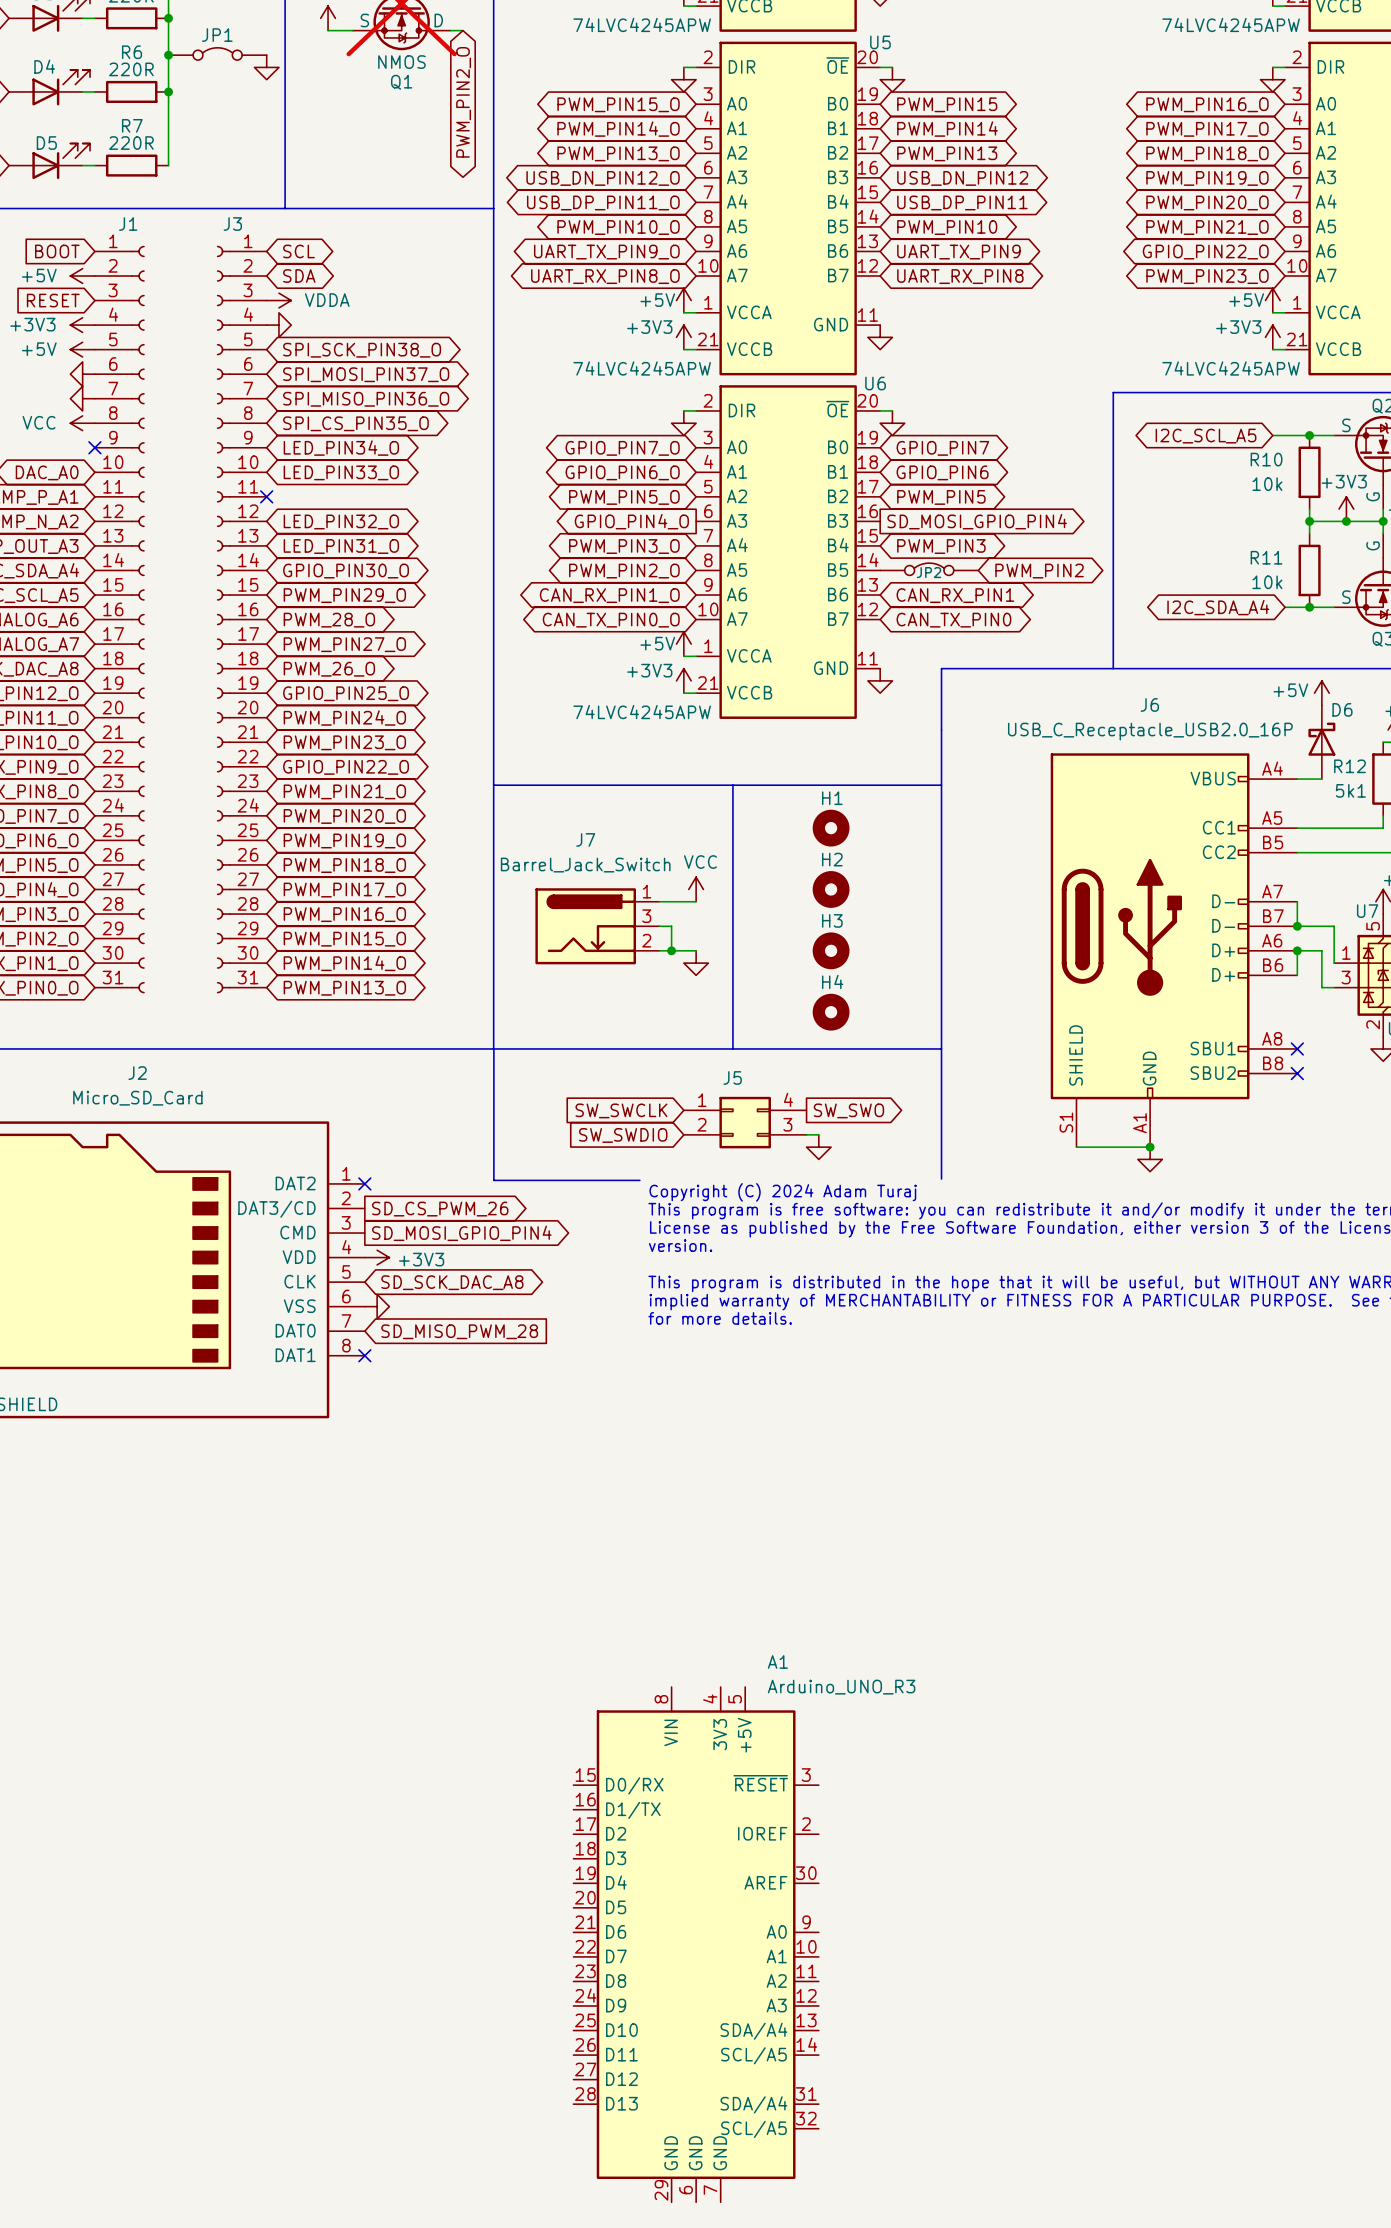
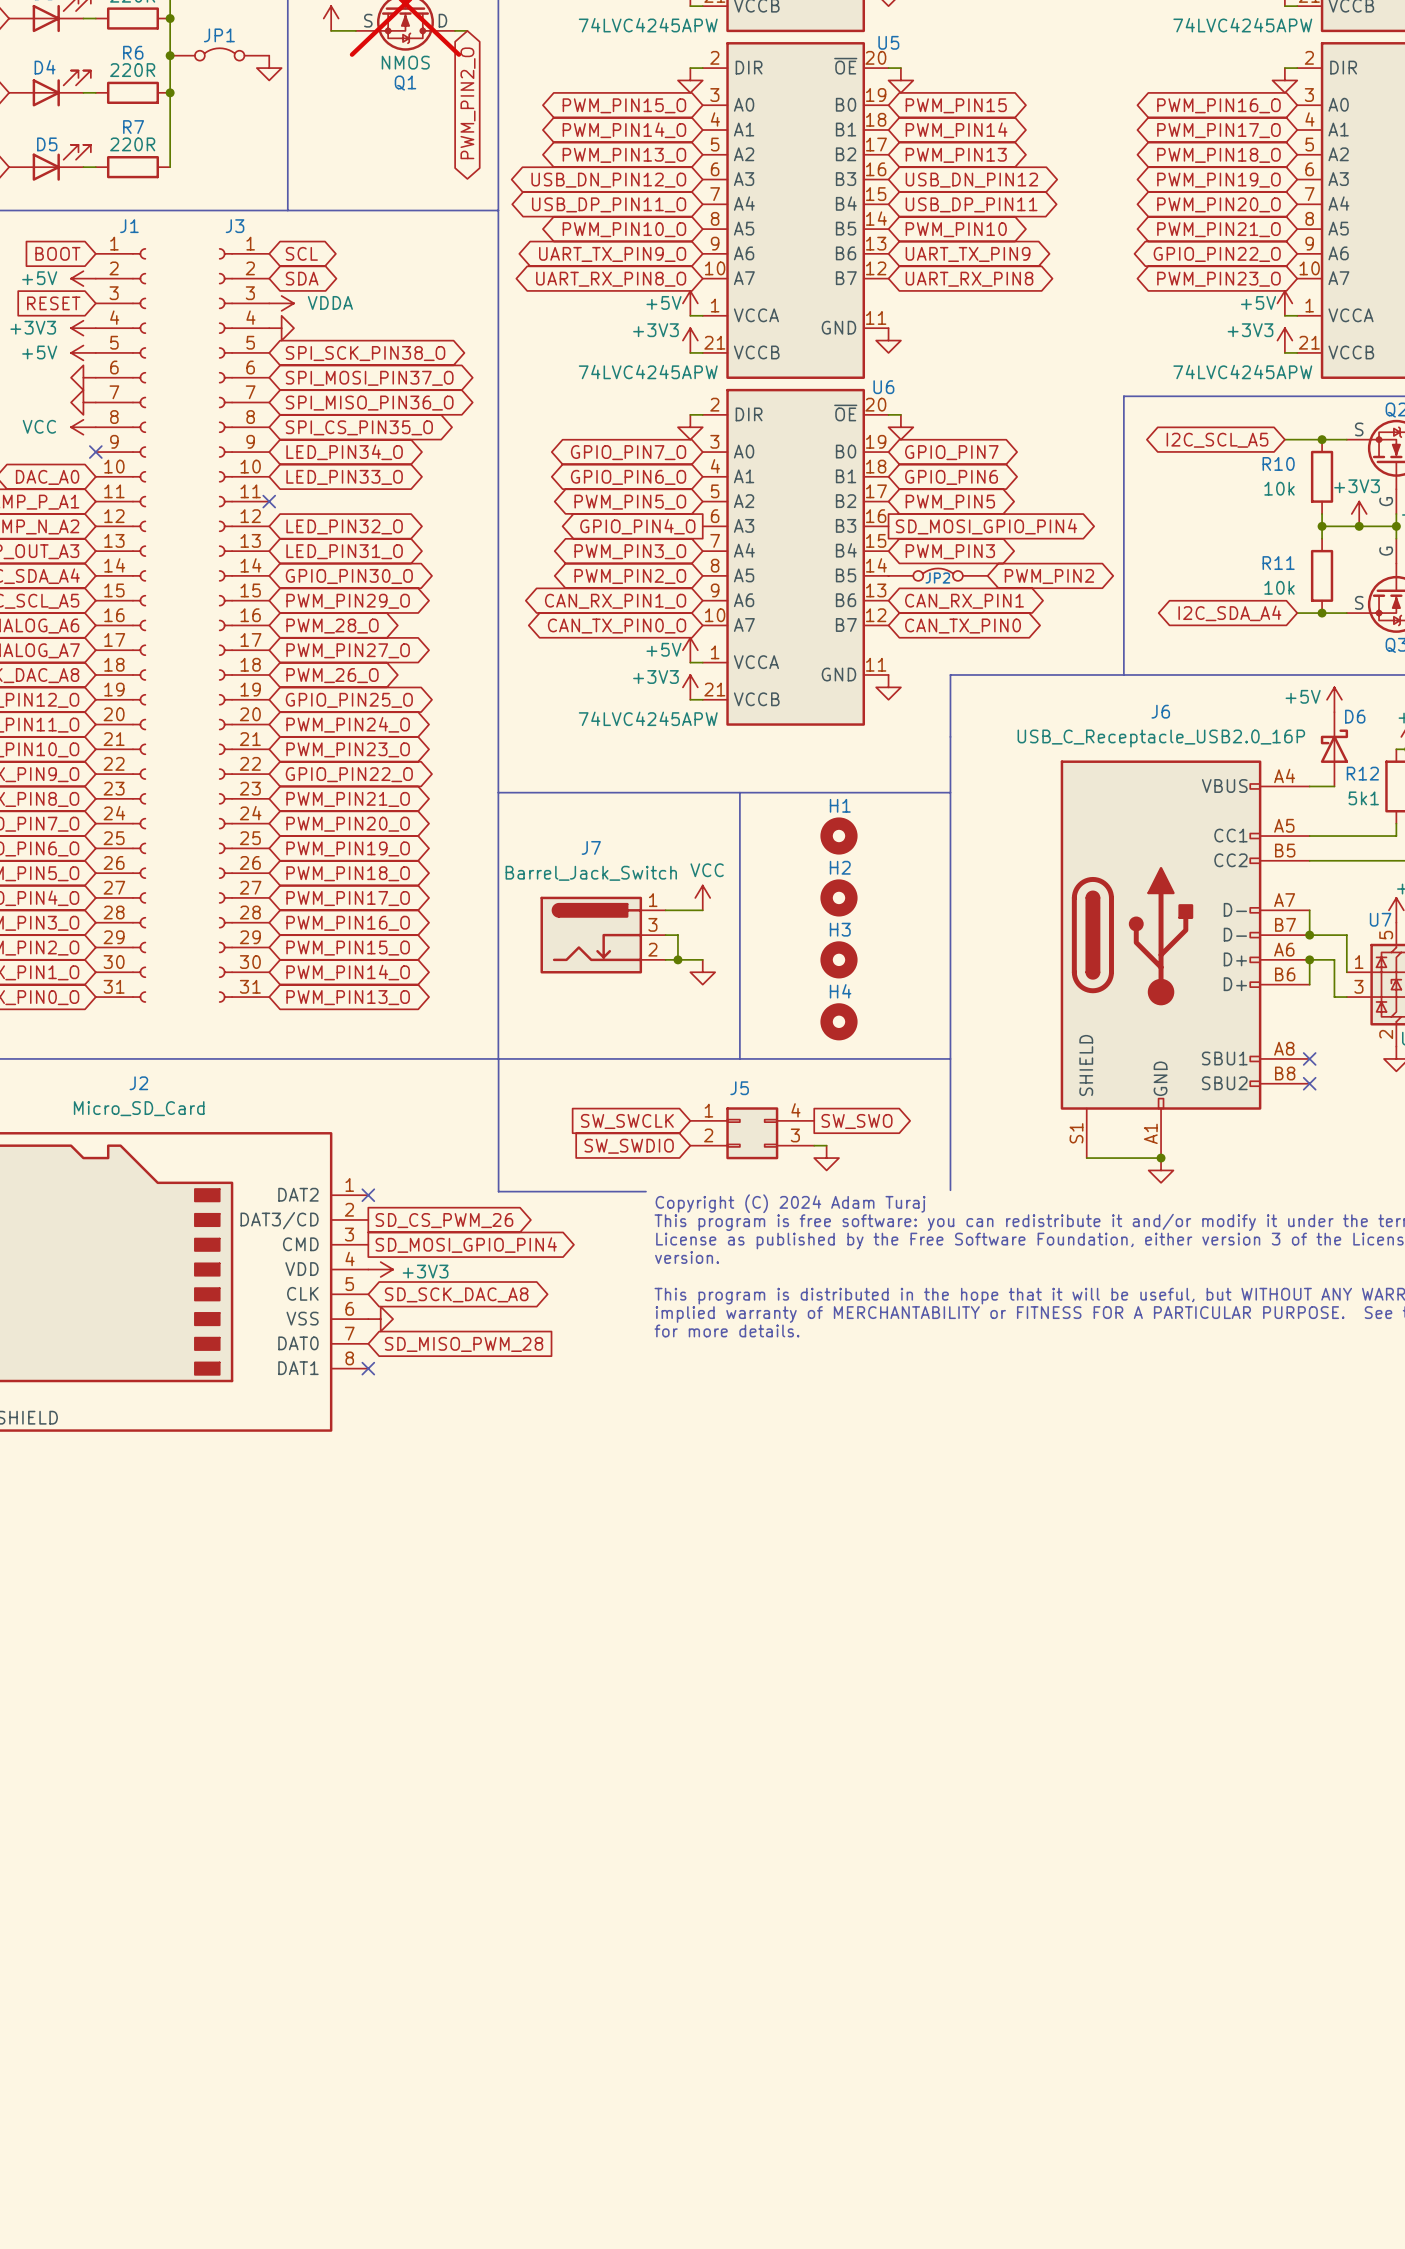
A1: Arduino_UNO_R3 (696, 1944) -> none

